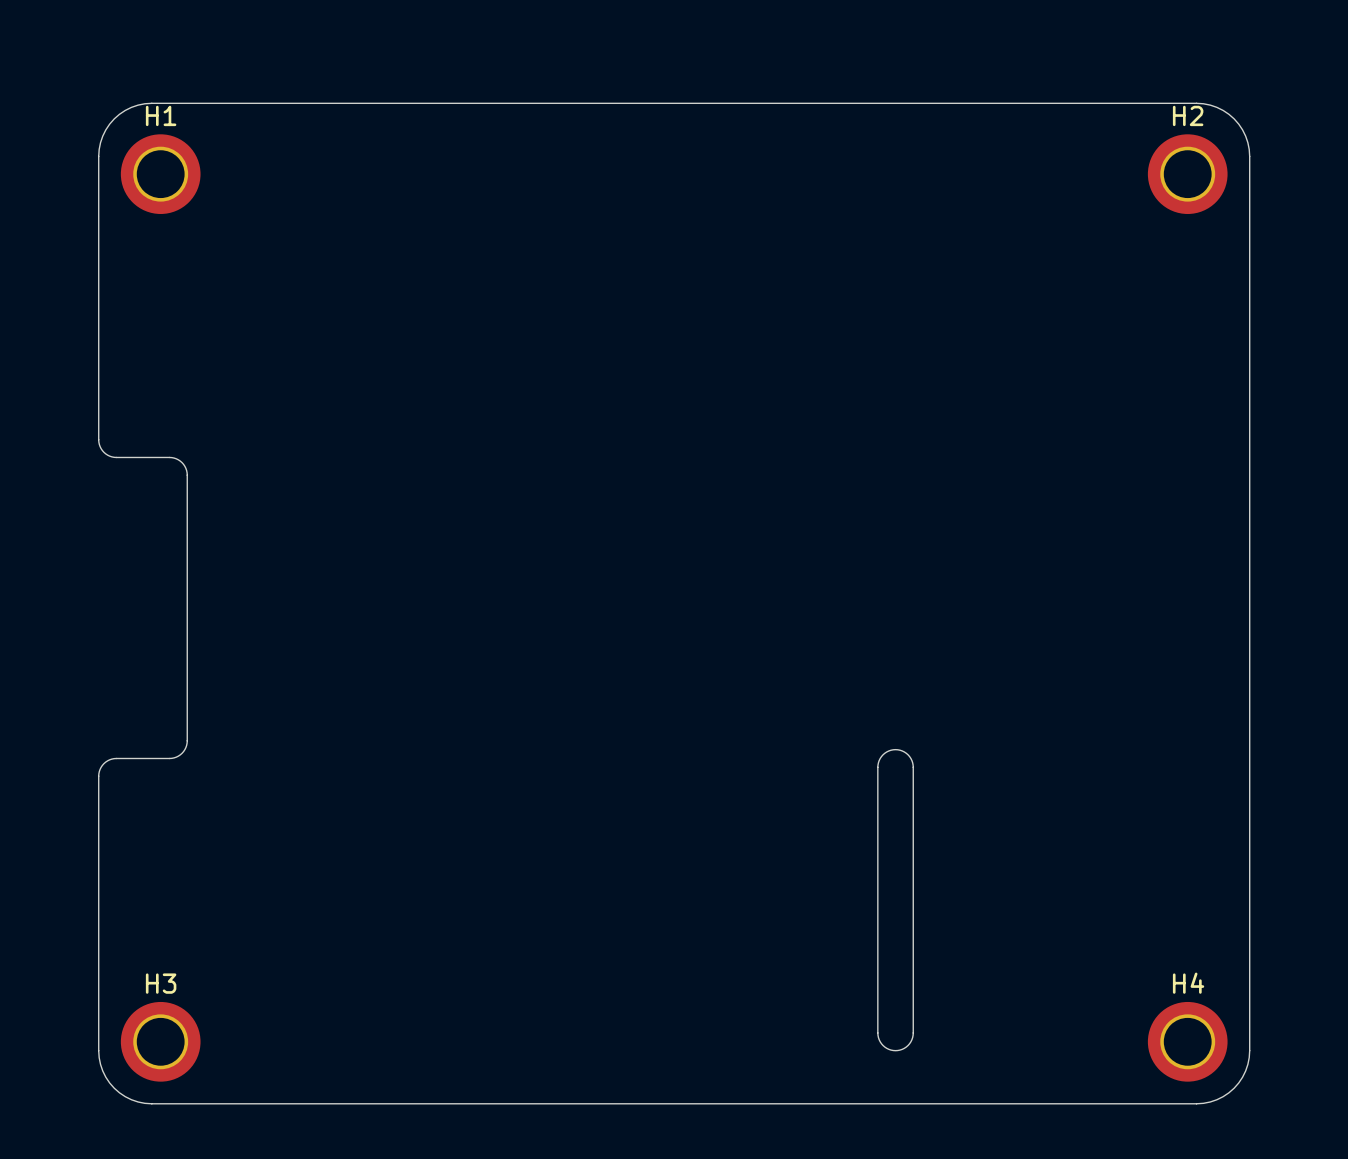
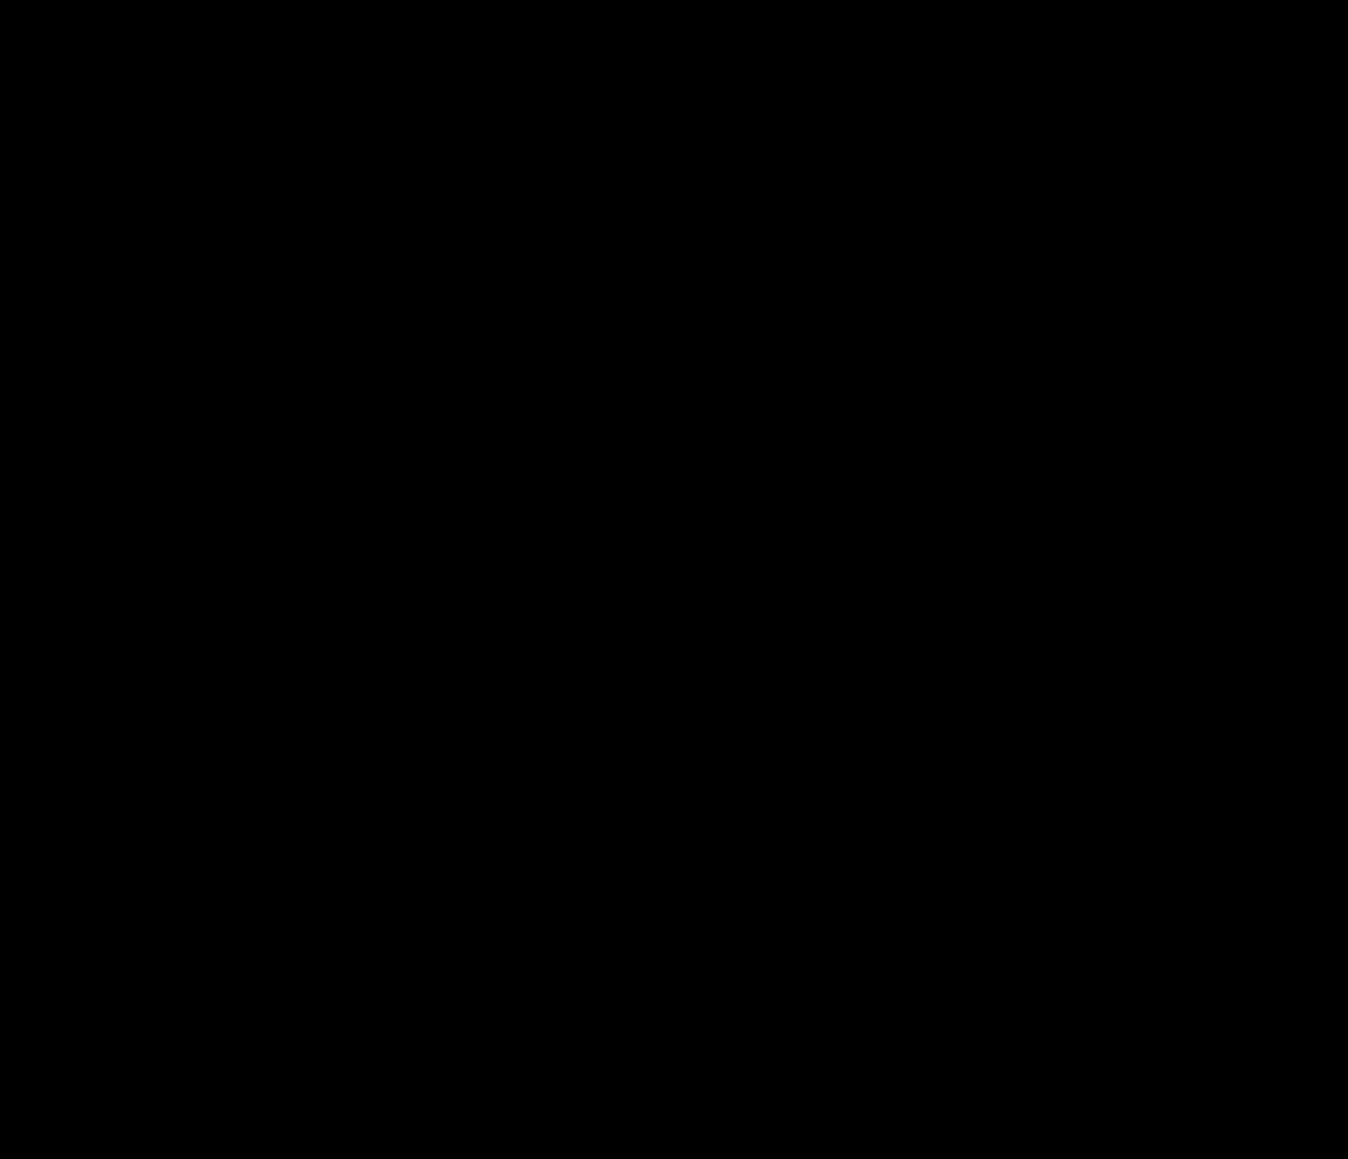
board edge: (151, 103) (1196, 103) (1216, 107) (1234, 118) (1245, 136) (1249, 156) (1249, 1050) (1245, 1070) (1234, 1088) (1216, 1099) (1196, 1103) (151, 1103) (131, 1099) (114, 1088) (102, 1070) (98, 1050) (99, 771) (103, 763) (114, 758) (176, 757) (184, 749) (187, 740) (186, 470) (182, 462) (171, 457) (109, 456) (101, 448) (98, 439) (99, 149) (105, 129) (114, 118) (131, 107) (151, 103) -> none
H1: (160, 174) -> none
H2: (1187, 174) -> none
board edge: (877, 767) (877, 1035) (884, 1047) (897, 1050) (908, 1045) (913, 1032) (913, 765) (908, 754) (895, 749) (883, 754) (877, 767) -> none
H3: (160, 1041) -> none
H4: (1187, 1041) -> none

